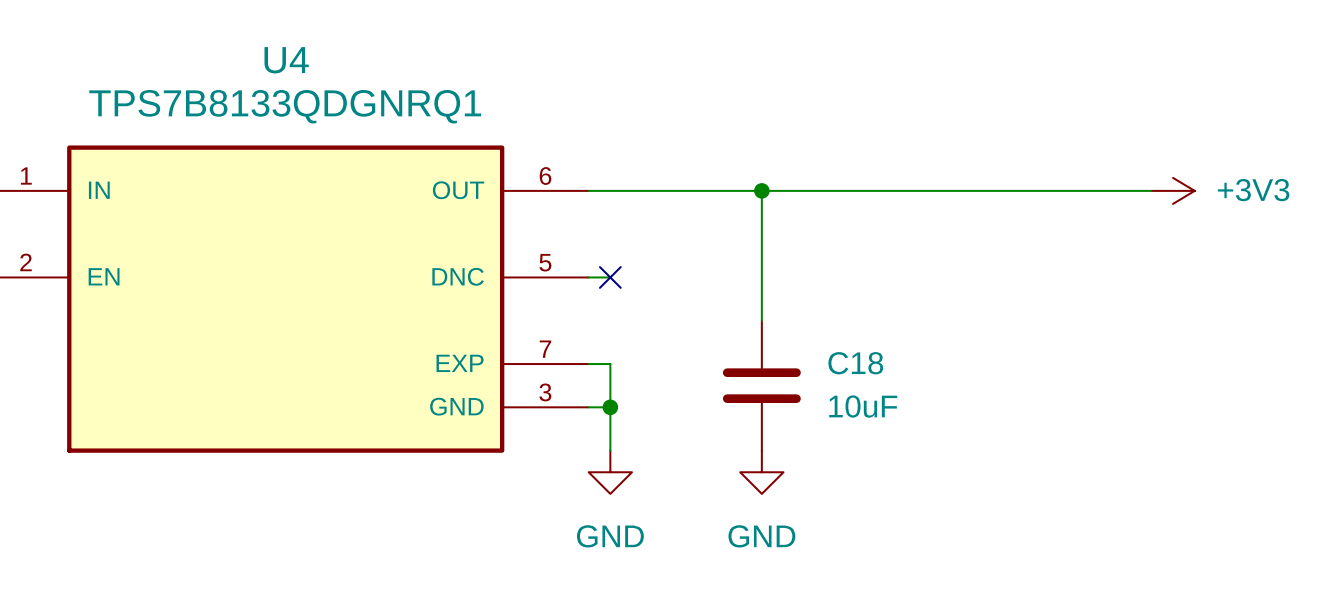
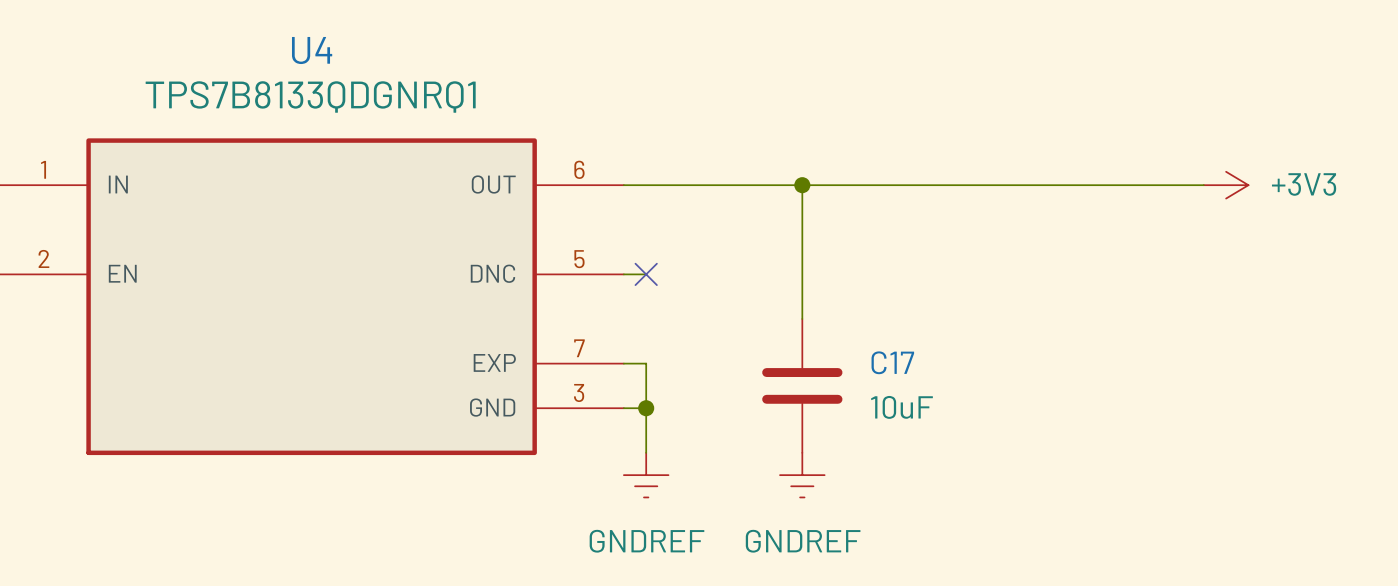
C18 name: C18 (855, 363) -> C17 (892, 362)
power symbol: GND (610, 472) -> GNDREF (646, 475)
power symbol: GND (761, 472) -> GNDREF (802, 475)

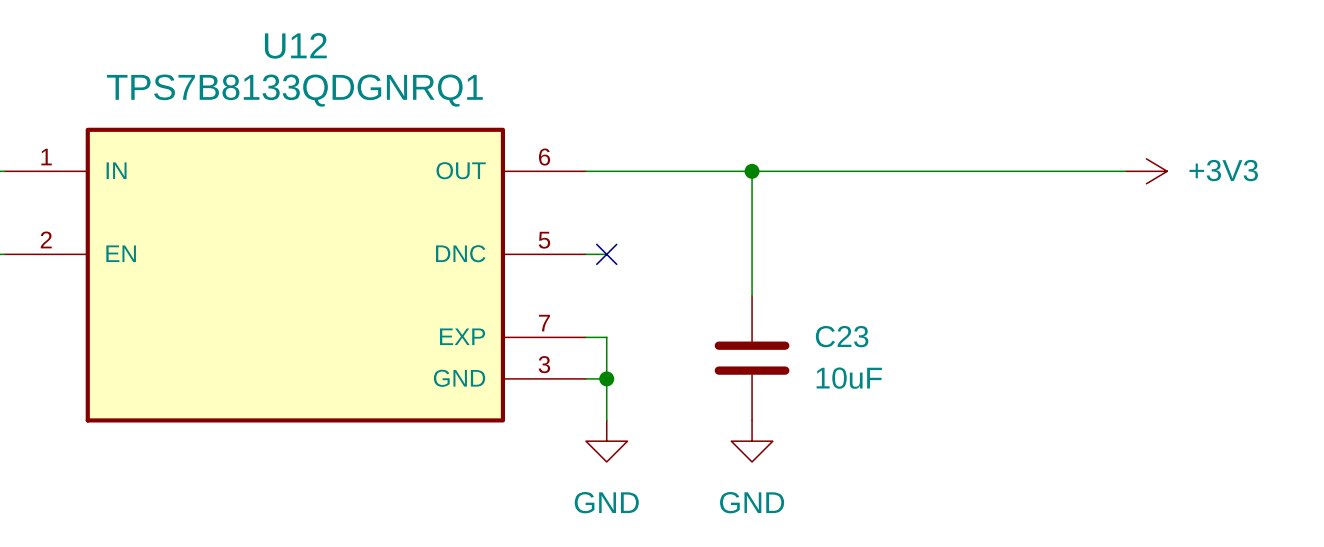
U4 name: U4 (312, 50) -> U12 (295, 45)
C17 name: C17 (892, 362) -> C23 (842, 336)
power symbol: GNDREF (646, 475) -> GND (606, 441)
power symbol: GNDREF (802, 475) -> GND (752, 441)

